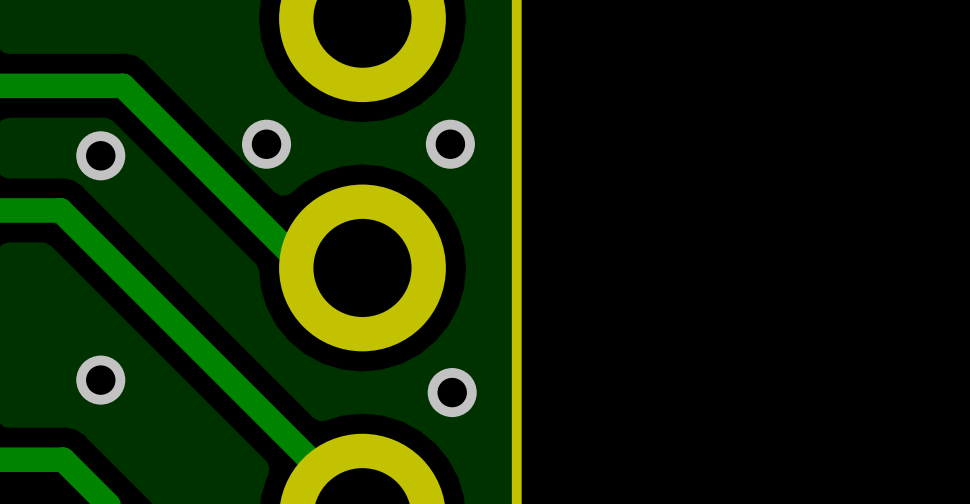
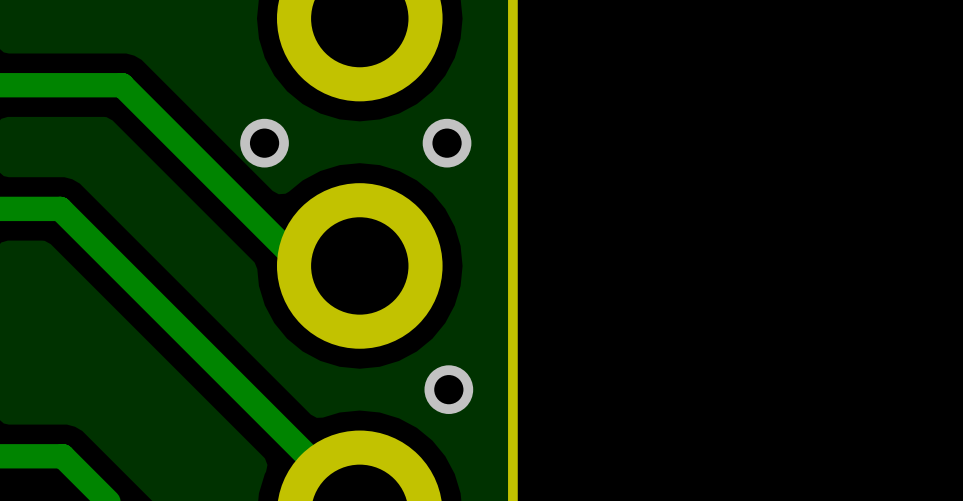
via: (100, 155) -> none
via: (100, 380) -> none

